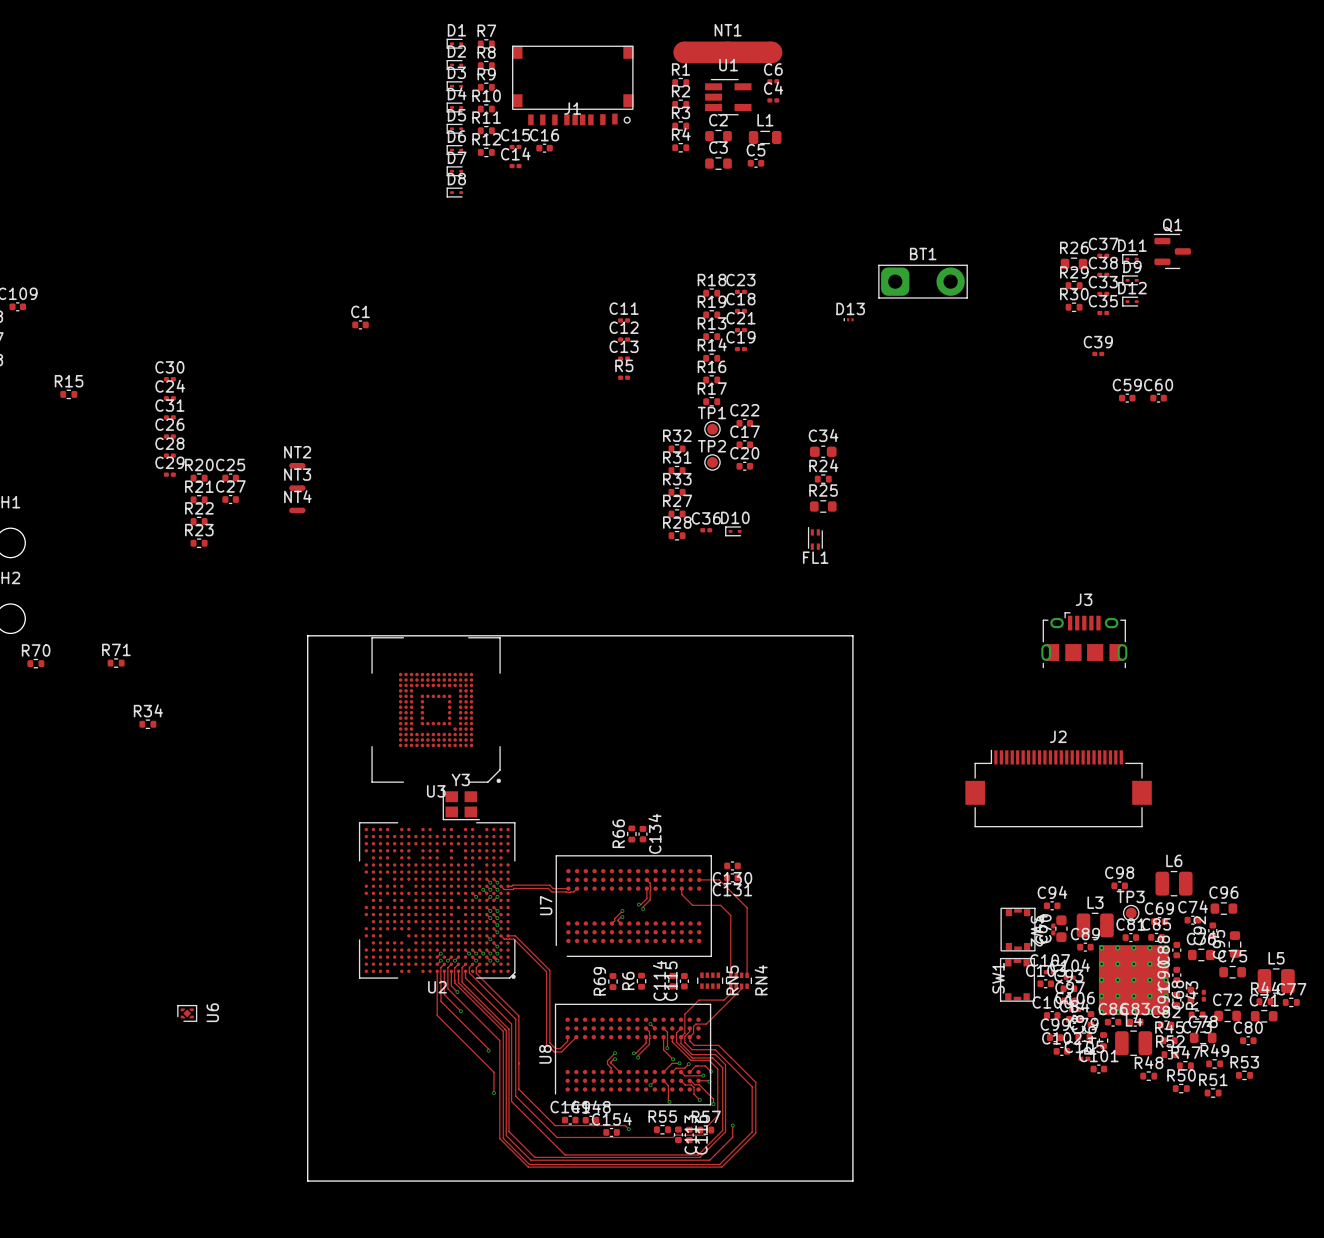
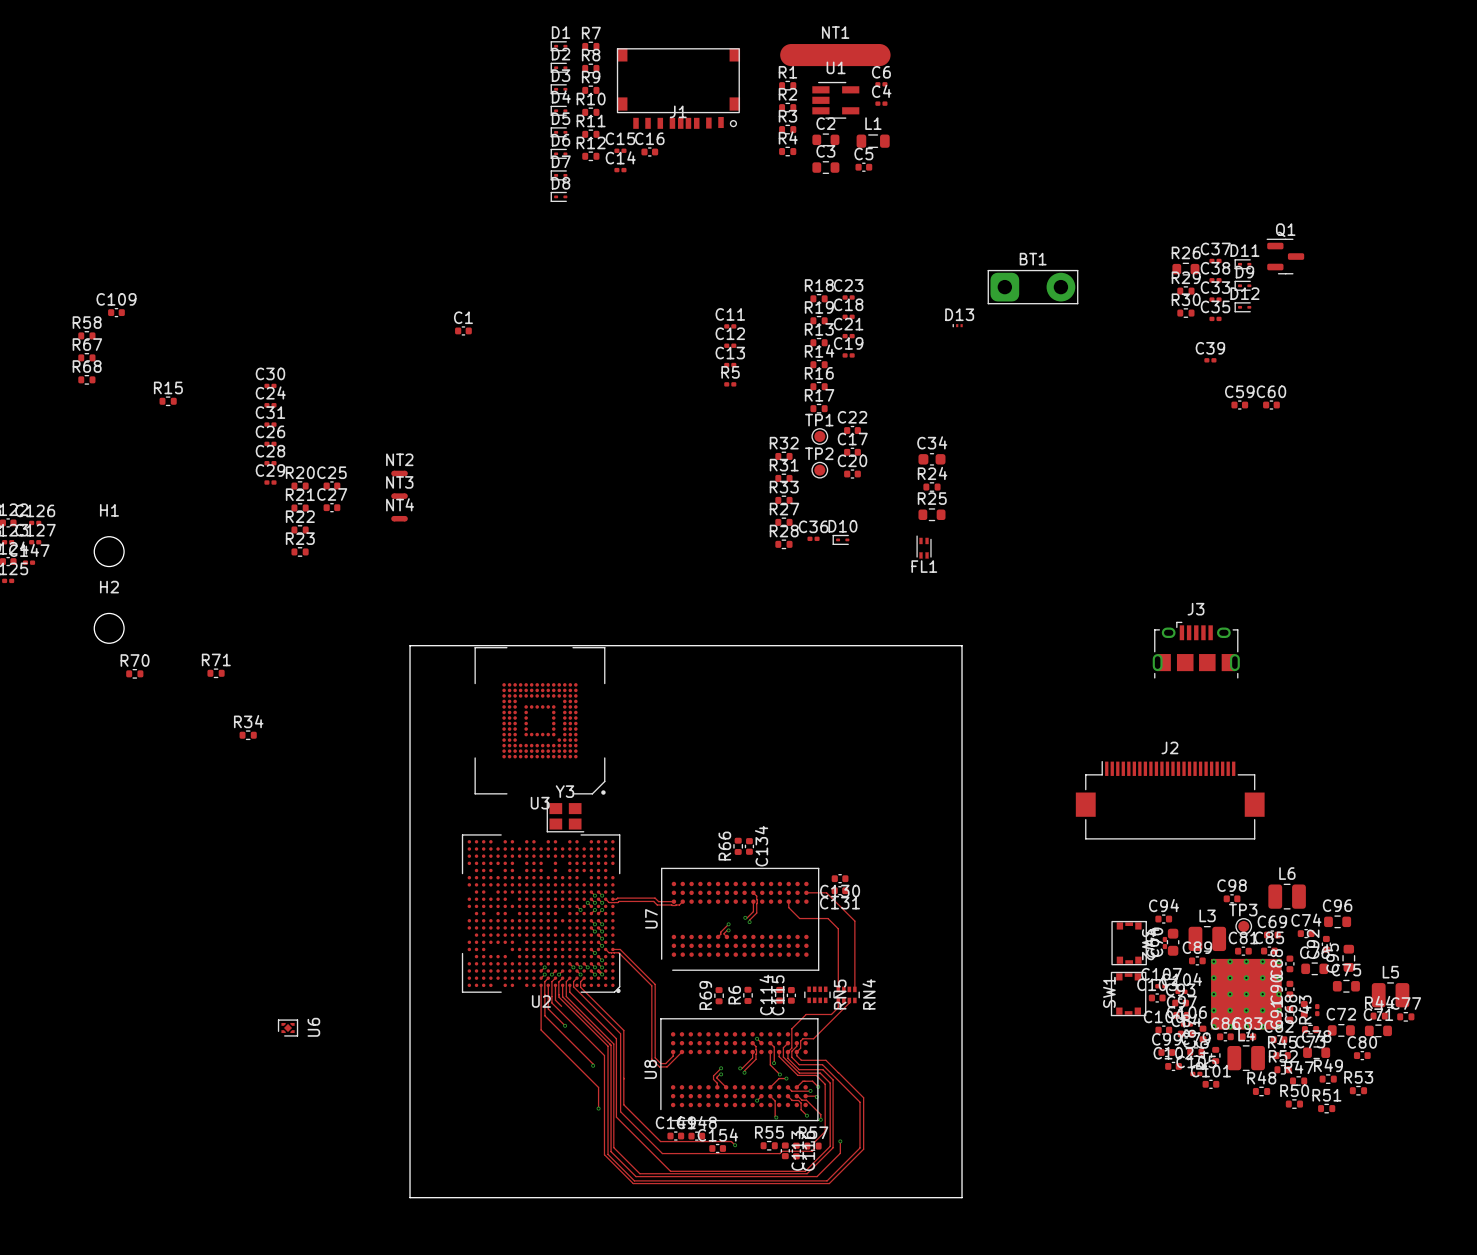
via: (457, 992) -> none
track: (688, 1064) (684, 1068) (676, 1068) (672, 1072) -> none
via: (688, 1064) -> none

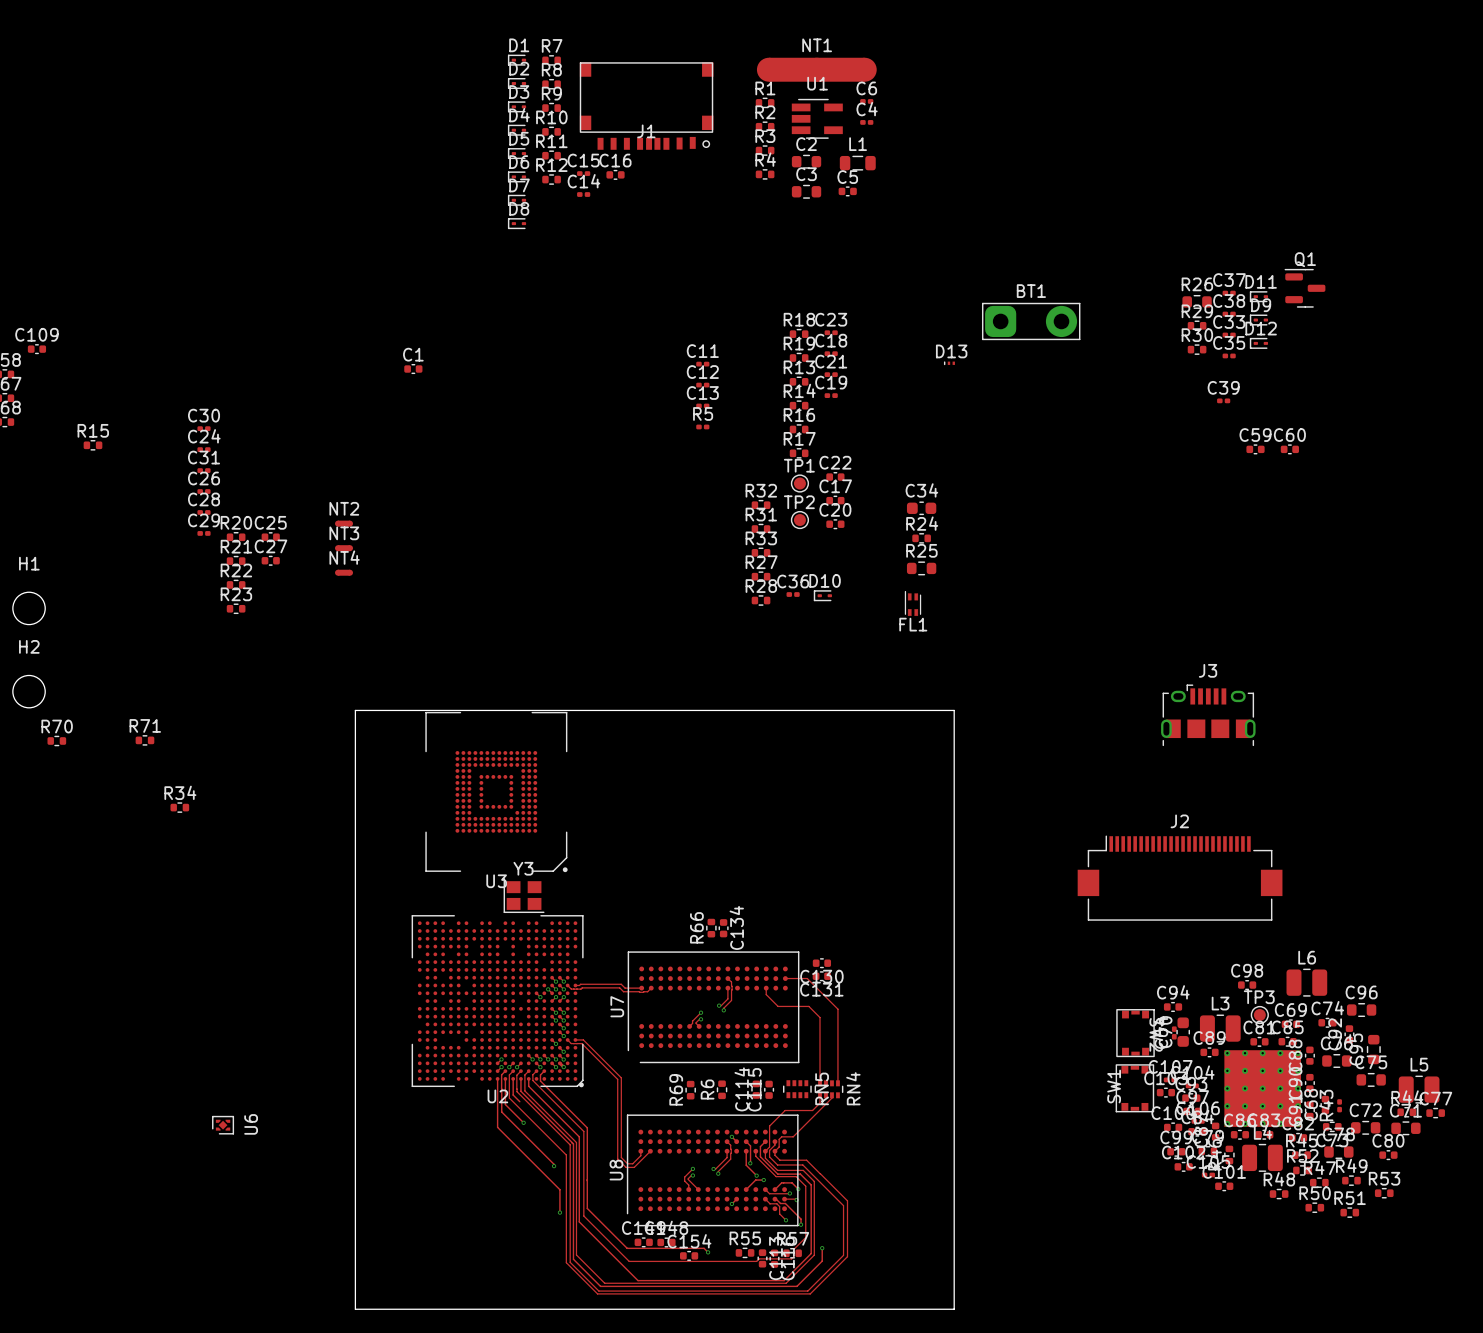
track: (770, 1096) (775, 1101) (776, 1117) -> none
via: (776, 1117) -> none

